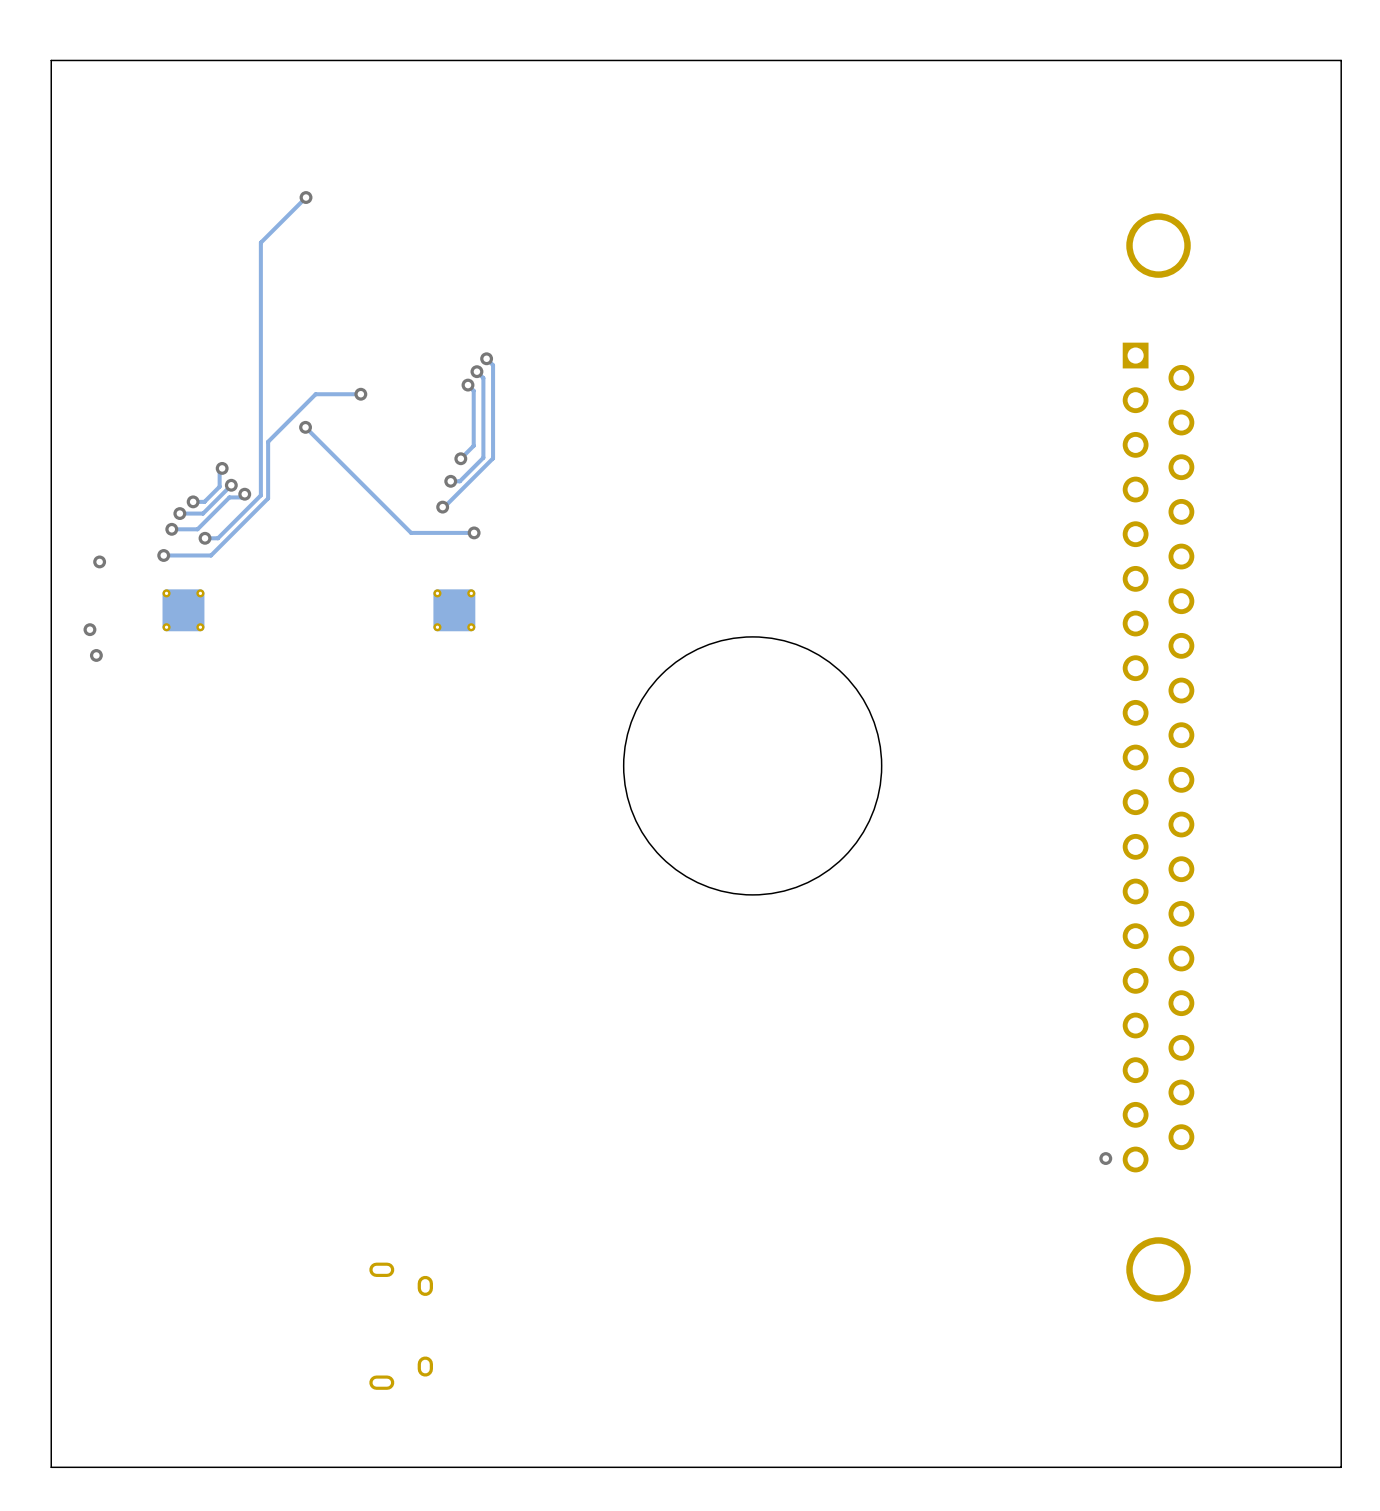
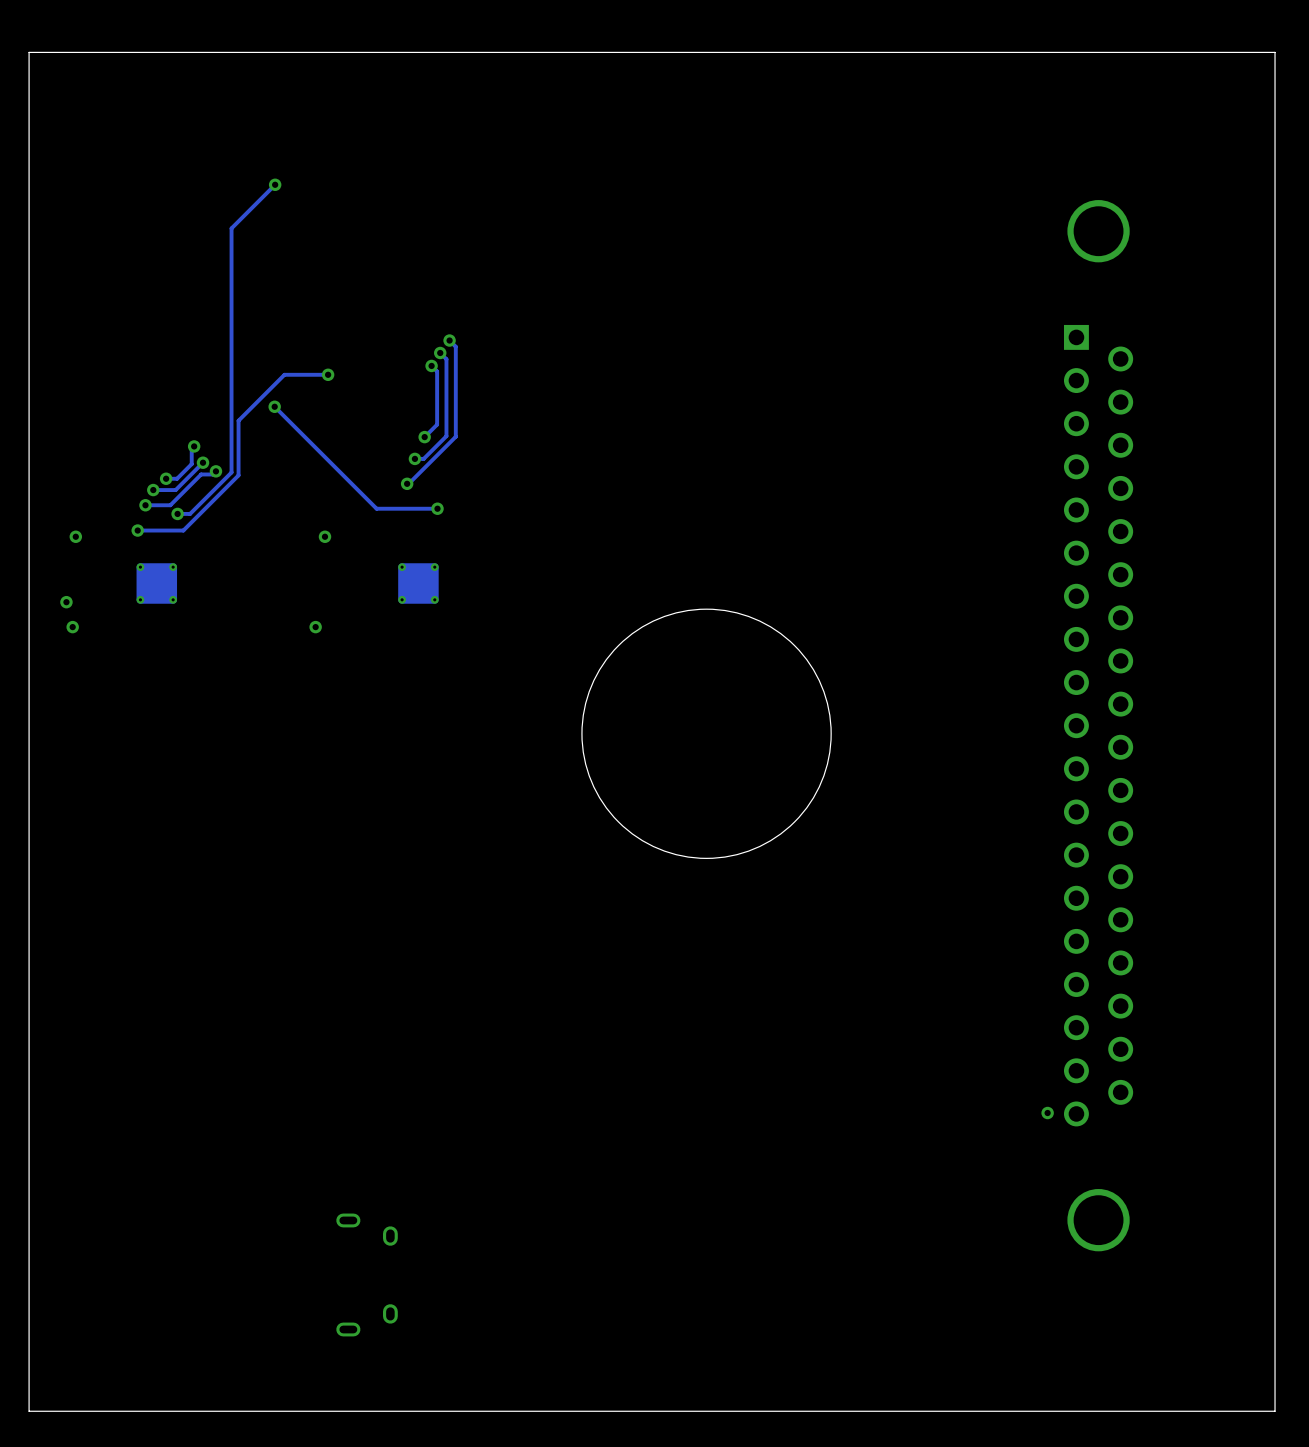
via: none -> (324, 536)
via: none -> (315, 627)

